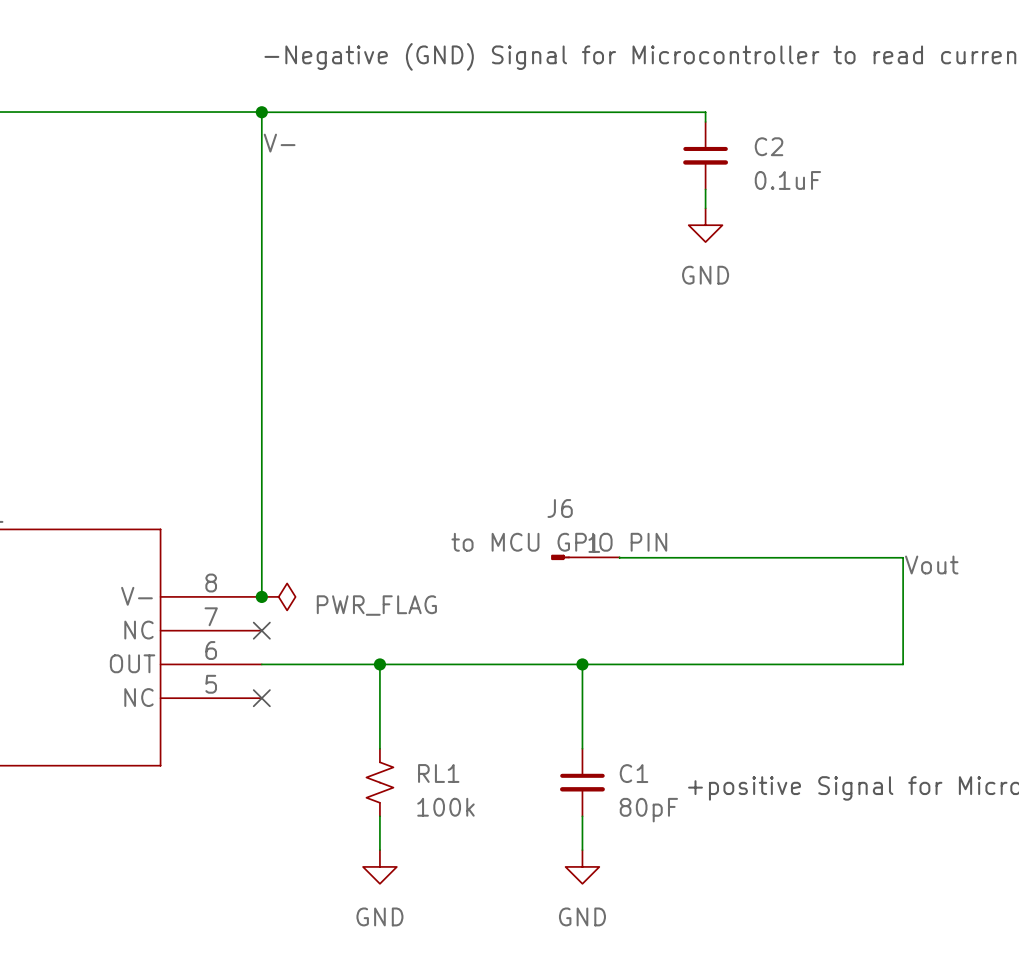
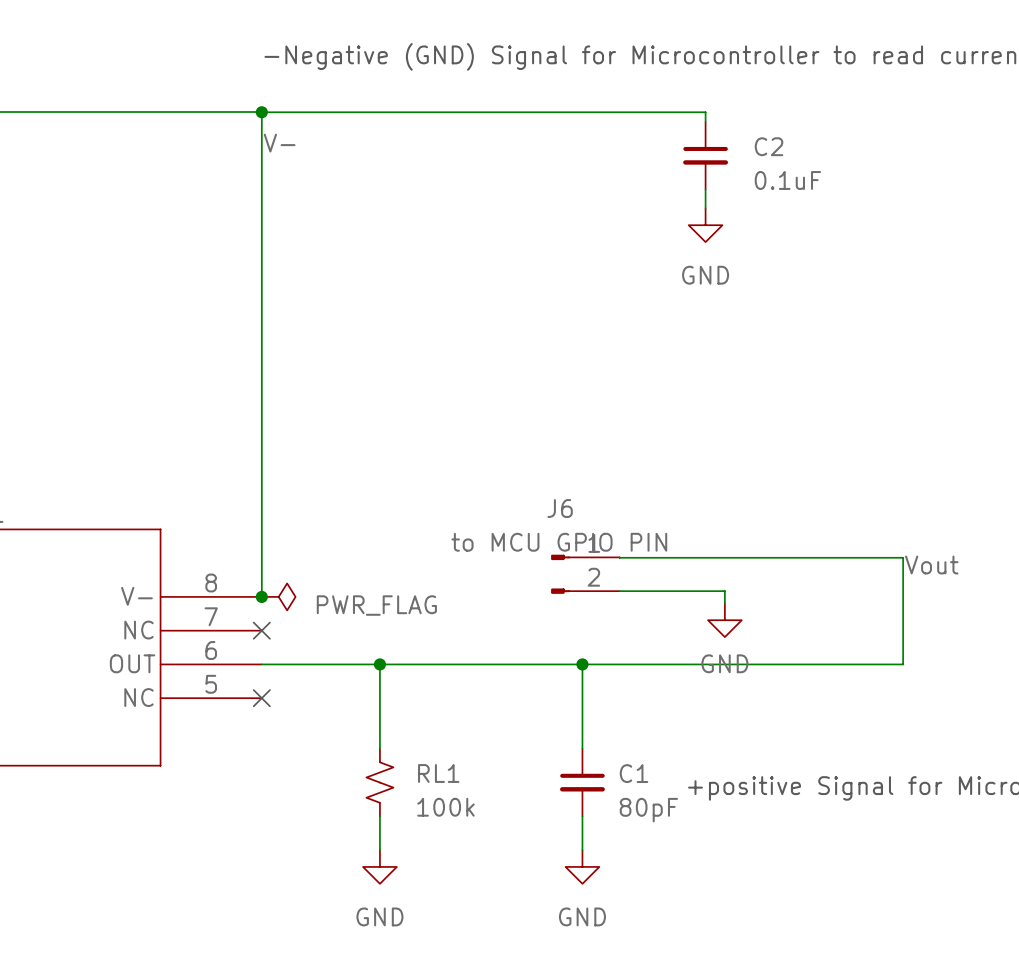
J6 symbol: [551, 554, 620, 561] -> [551, 554, 620, 594]
wire: none -> (619, 591) (724, 591) (724, 603)
power symbol: none -> GND (724, 620)

